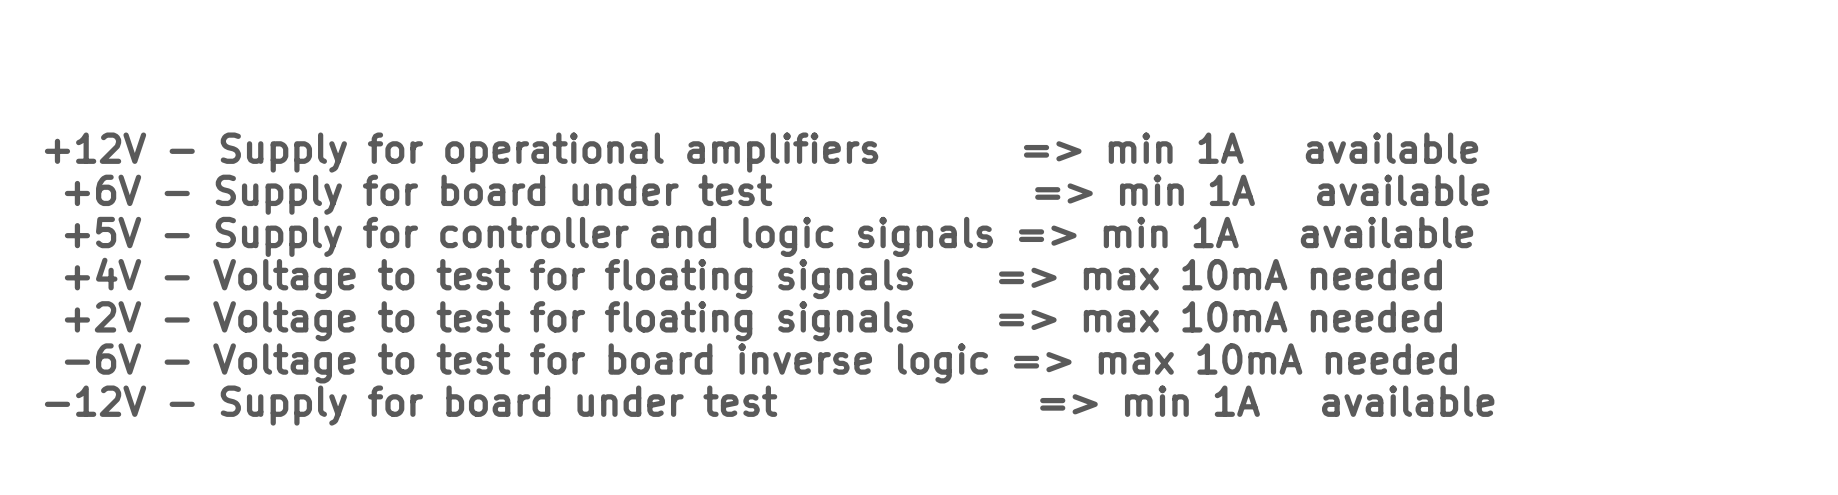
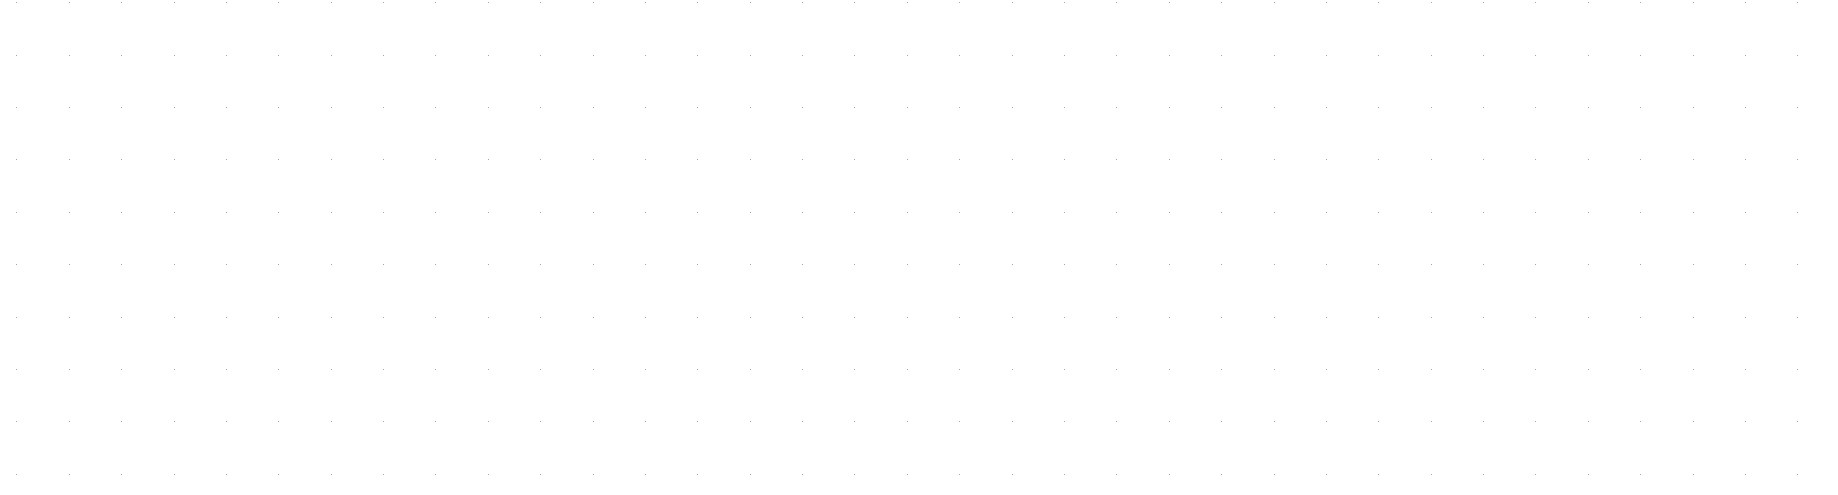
text: +12V - Supply for operational amplifiers => min 1A available (761, 152) -> none
text: +6V - Supply for board under test => min 1A available (777, 194) -> none
text: +5V - Supply for controller and logic signals => min 1A available (769, 236) -> none
text: +4V - Voltage to test for floating signals => max 10mA needed (753, 278) -> none
text: +2V - Voltage to test for floating signals => max 10mA needed (753, 321) -> none
text: -6V - Voltage to test for board inverse logic => max 10mA needed (760, 363) -> none
text: -12V - Supply for board under test => min 1A available (769, 405) -> none

